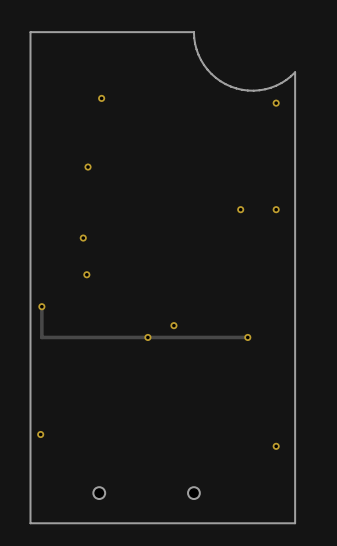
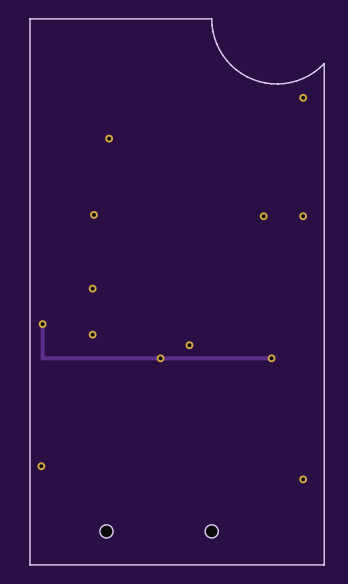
via: (101, 98) -> none
via: none -> (109, 138)
via: (88, 167) -> none
via: none -> (93, 214)
via: (83, 238) -> none
via: none -> (92, 334)

